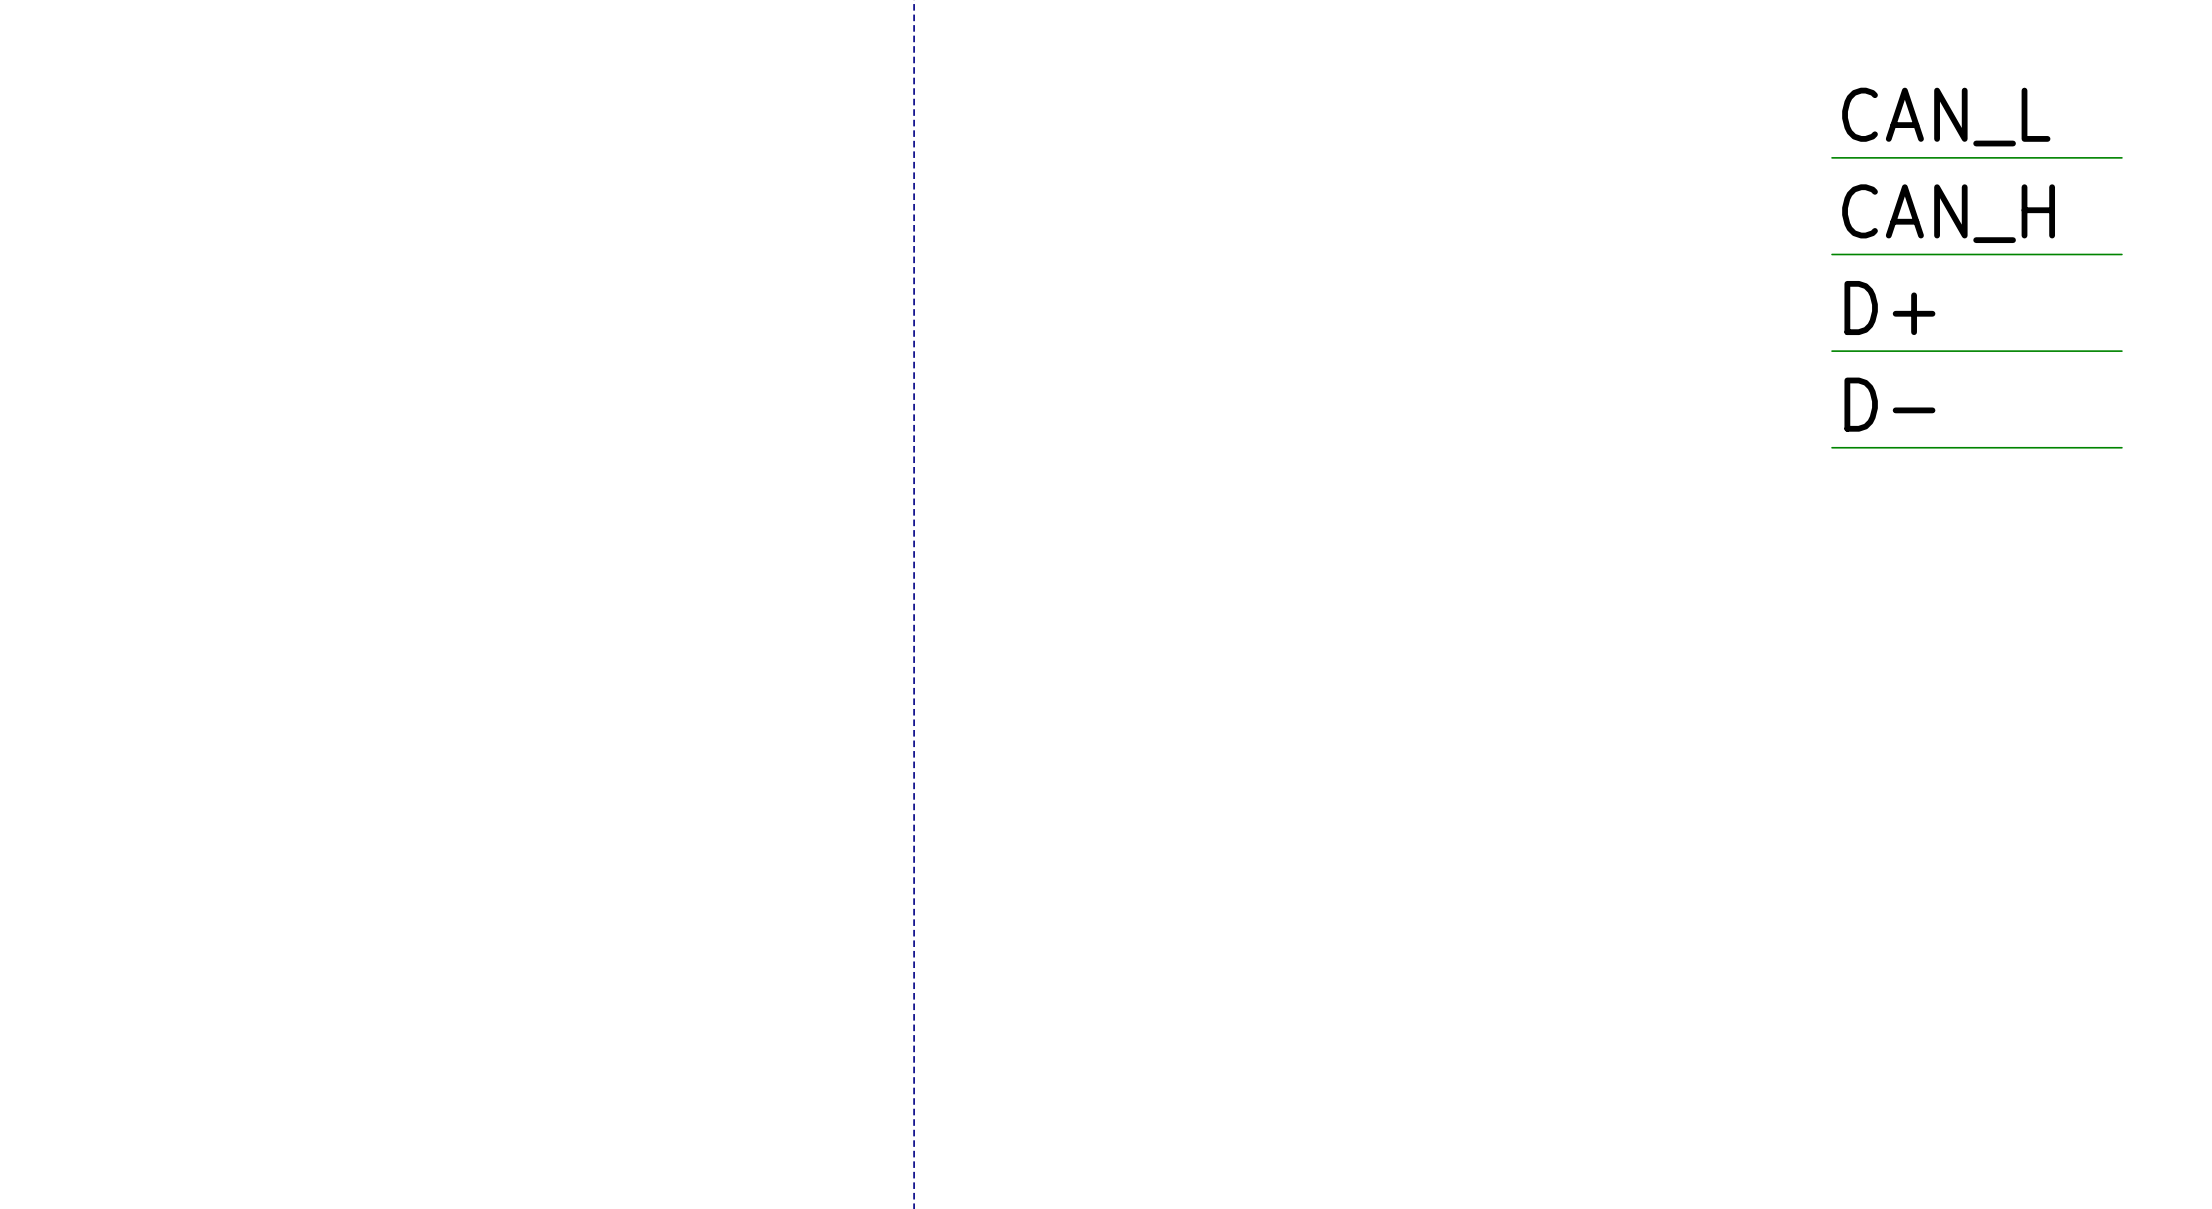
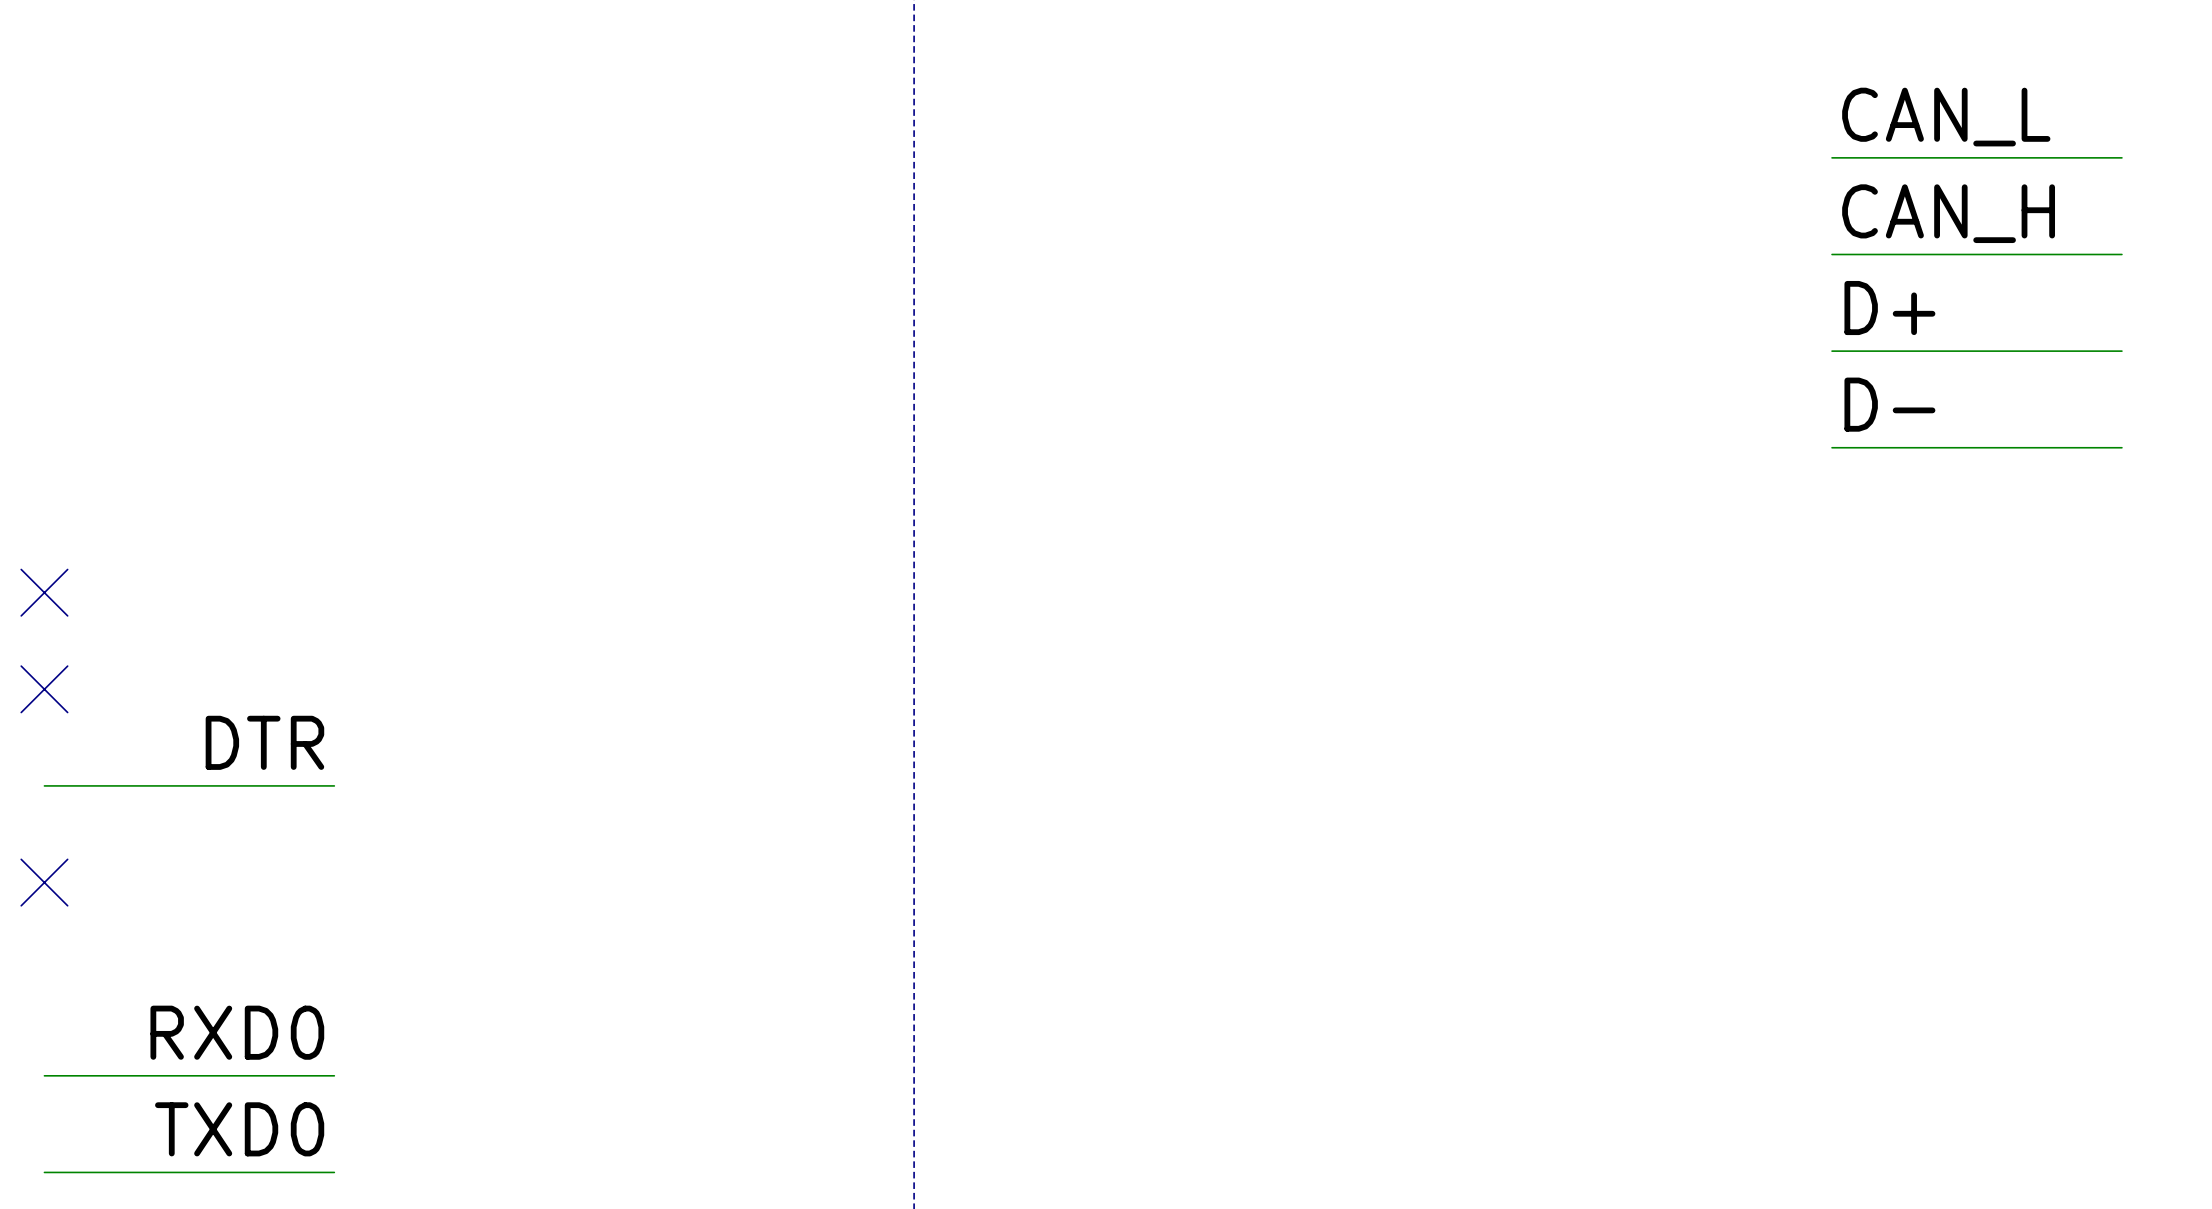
no-connect mark: none -> (44, 592)
no-connect mark: none -> (44, 689)
label: none -> DTR (264, 742)
wire: none -> (44, 785) (334, 785)
no-connect mark: none -> (44, 882)
label: none -> RXD0 (237, 1032)
wire: none -> (44, 1075) (334, 1075)
label: none -> TXD0 (239, 1129)
wire: none -> (44, 1172) (334, 1172)

